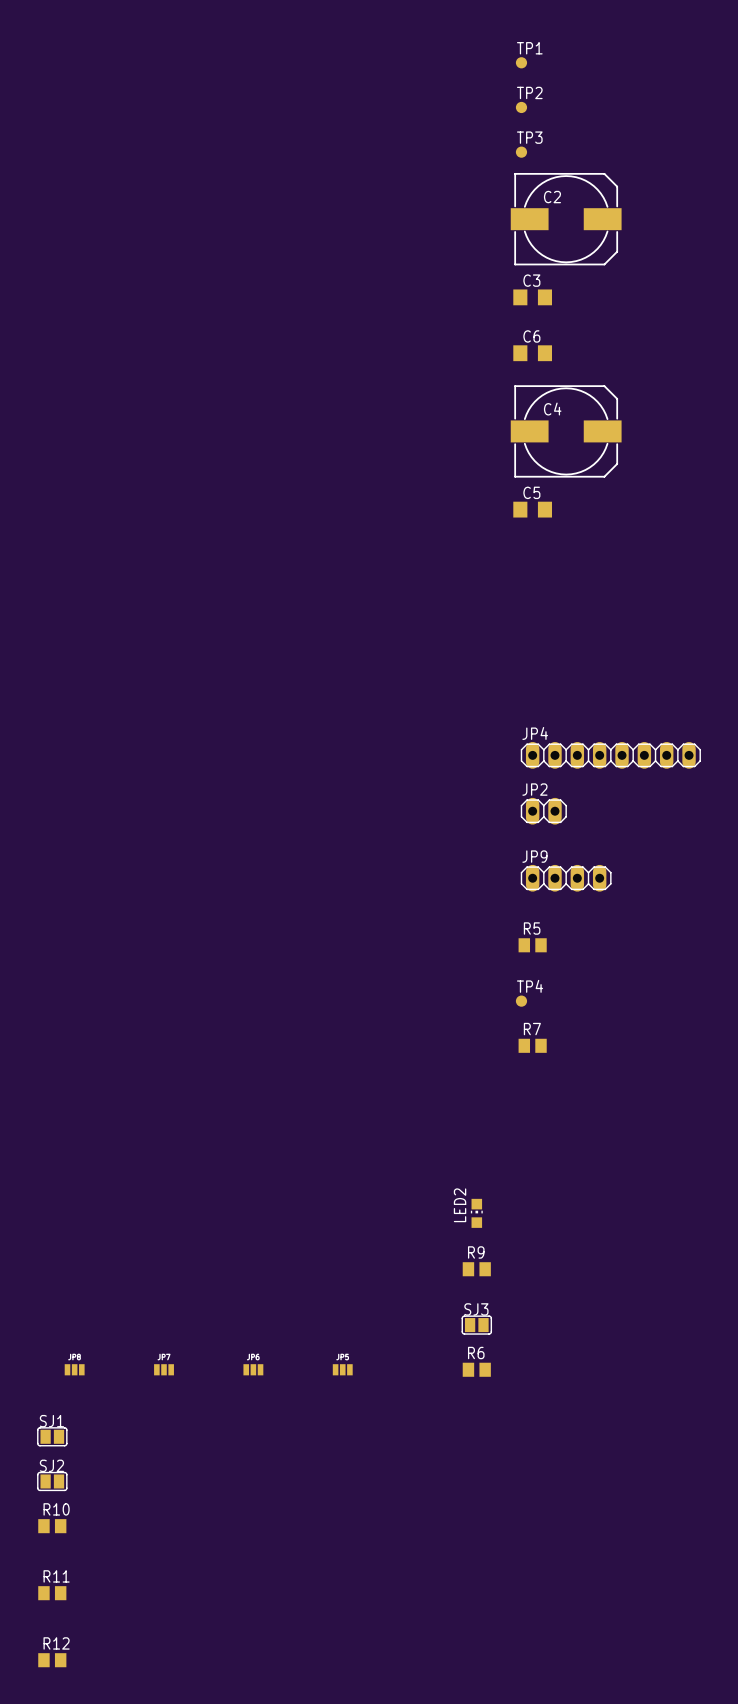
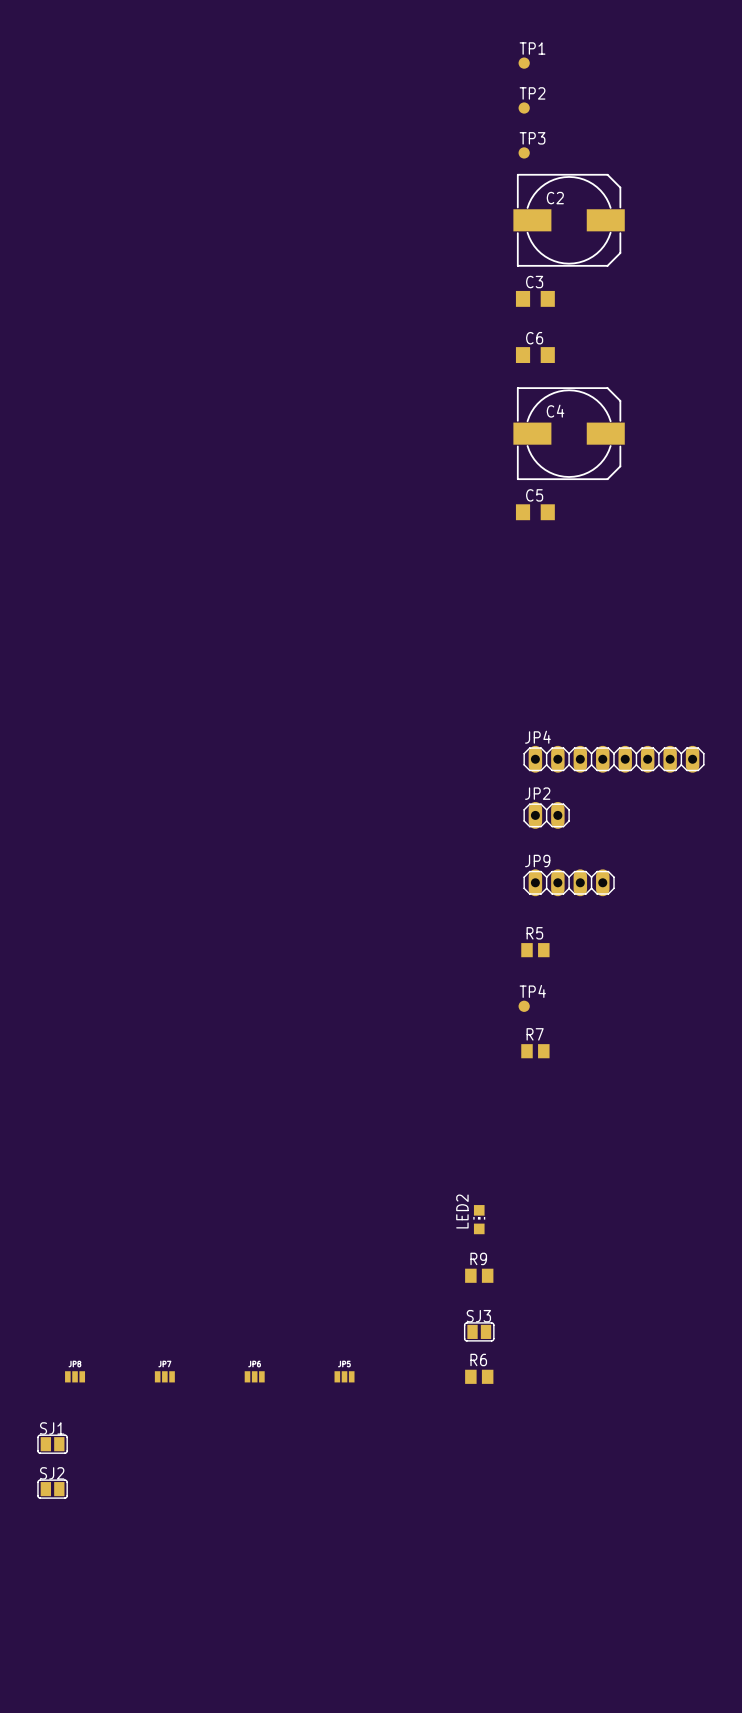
R10: (52, 1526) -> none
R11: (52, 1593) -> none
R12: (52, 1660) -> none

